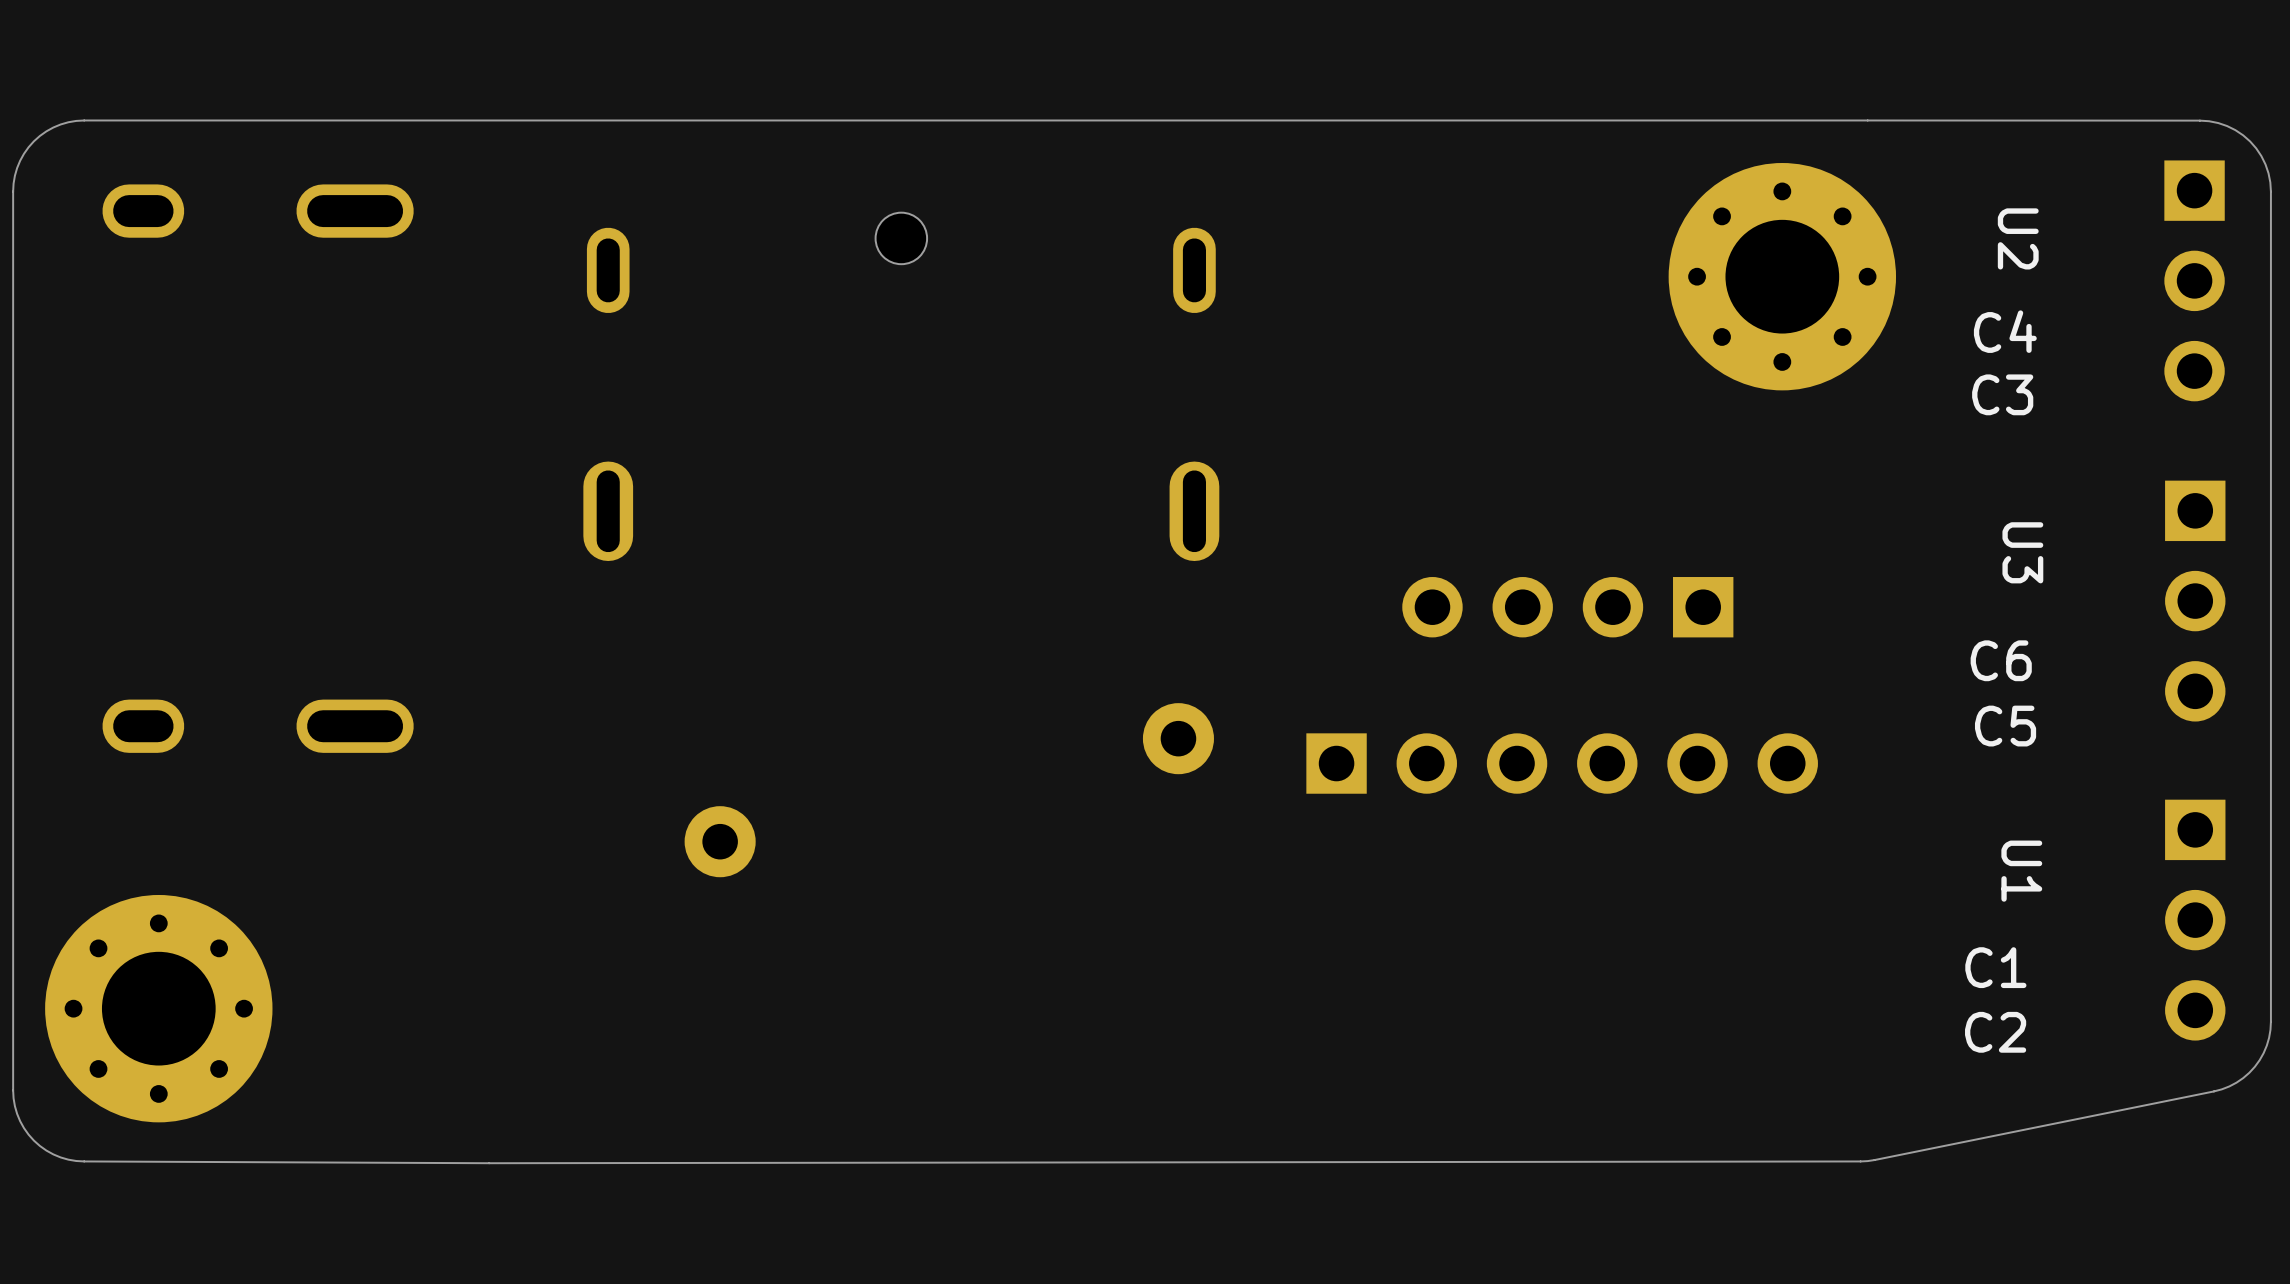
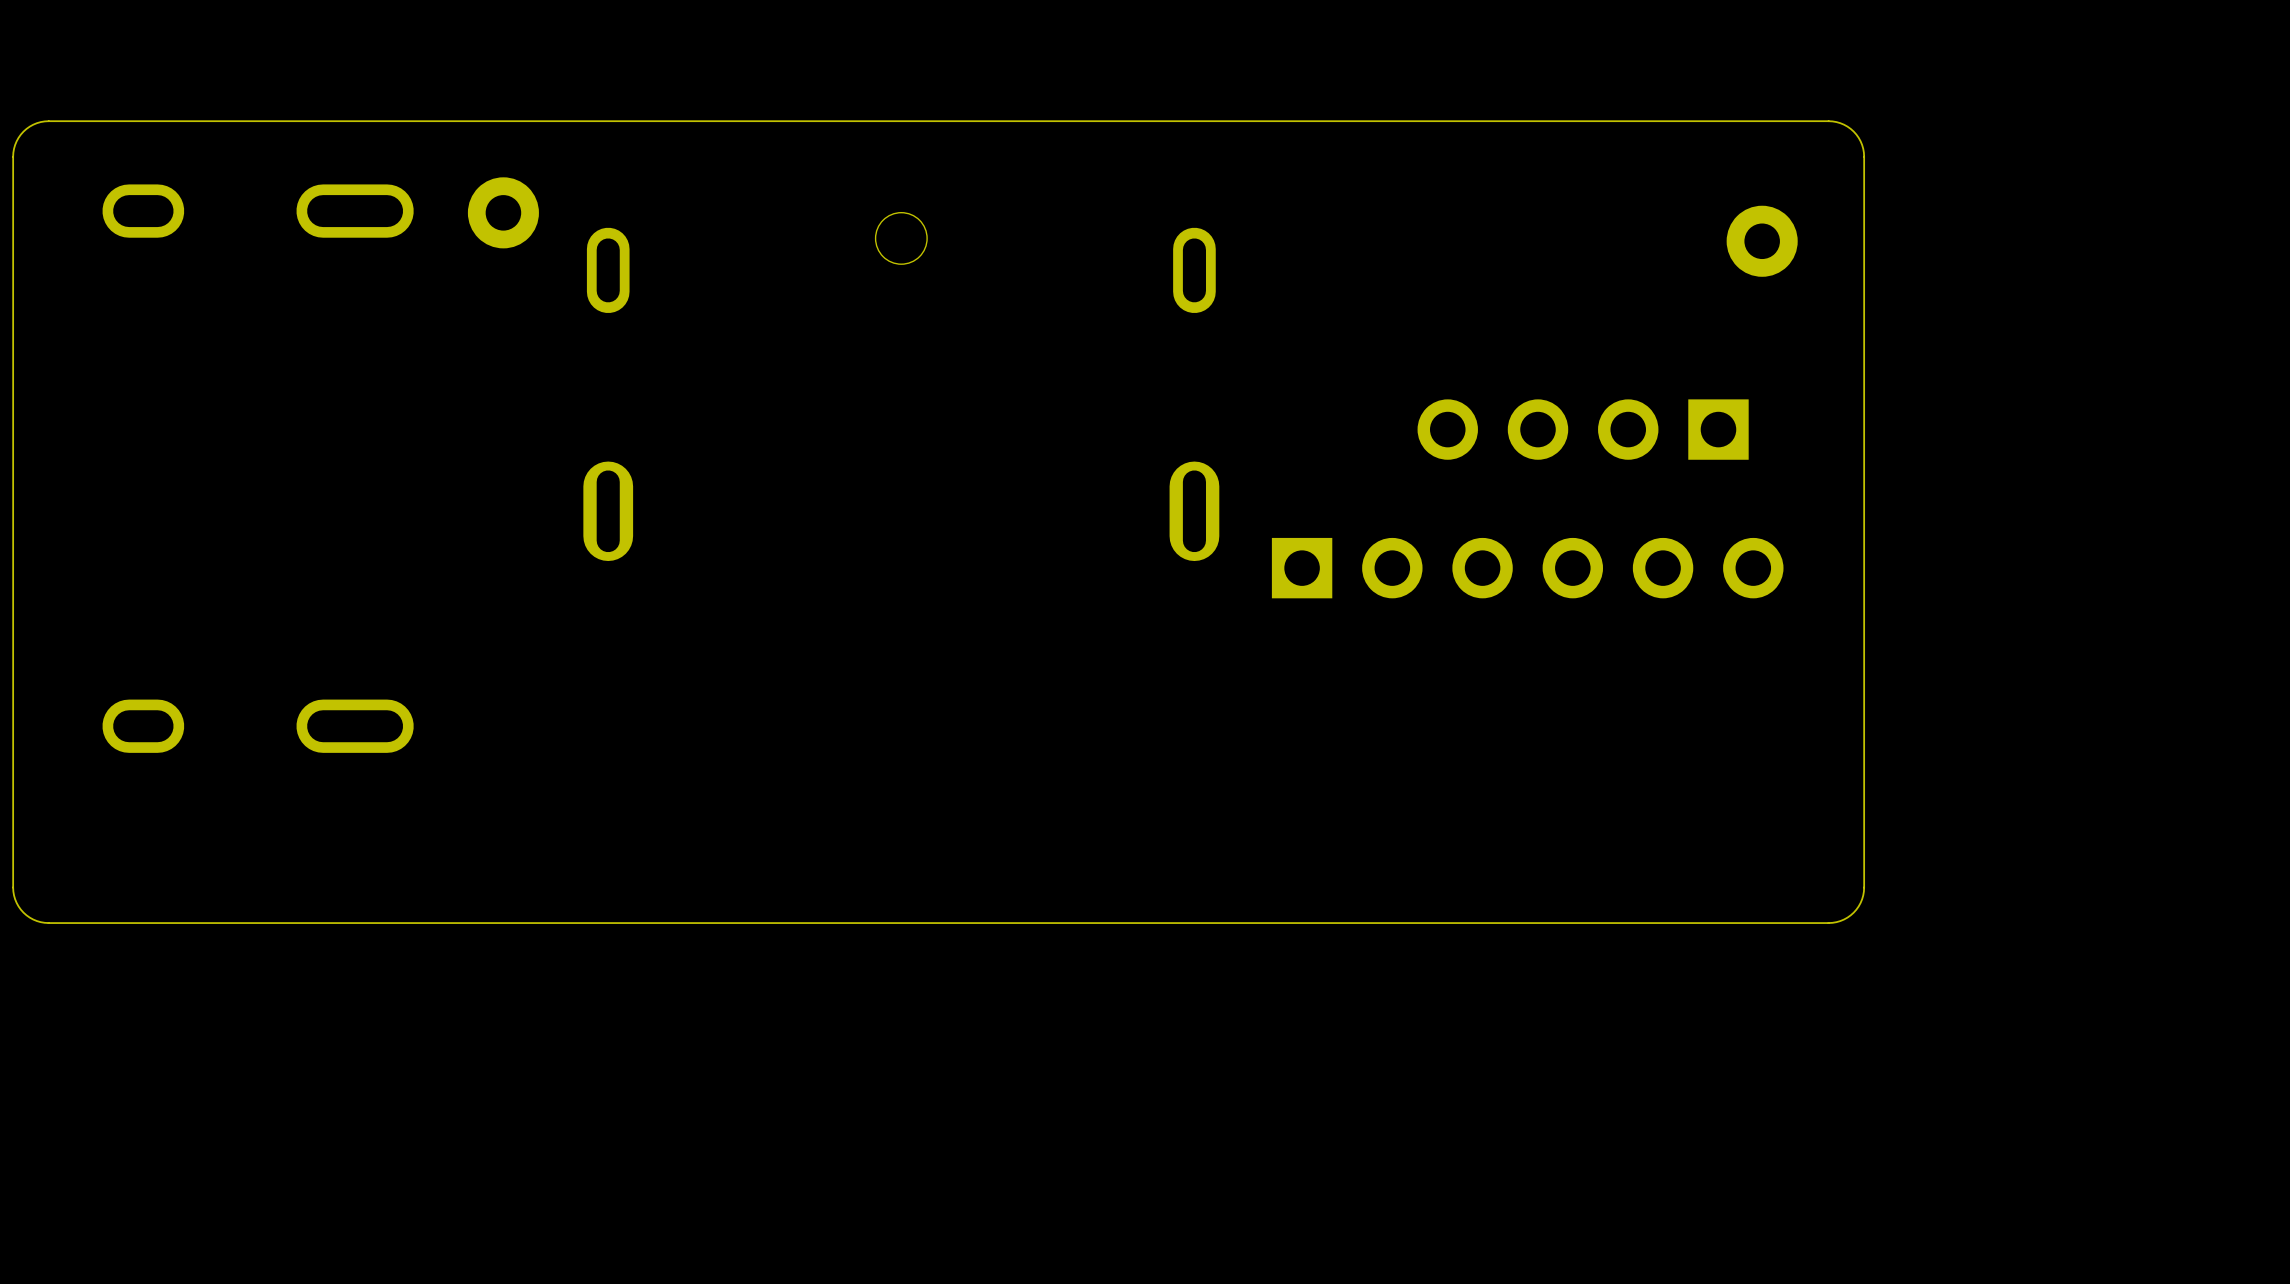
board edge: (13, 191) (17, 168) (24, 153) (33, 141) (46, 131) (60, 124) (84, 120) (2199, 120) (2227, 126) (2250, 141) (2261, 156) (2268, 173) (2270, 191) (2270, 1029) (2263, 1053) (2254, 1066) (2243, 1078) (2221, 1089) (1867, 1161) (489, 1163) (76, 1160) (53, 1154) (33, 1140) (24, 1128) (14, 1106) (13, 1090) (13, 887) -> (13, 191) (13, 152) (16, 141) (29, 126) (48, 121) (1828, 121) (1840, 123) (1853, 131) (1860, 141) (1864, 156) (1864, 887) (1858, 906) (1850, 915) (1840, 921) (1828, 923) (48, 923) (33, 919) (23, 912) (16, 902) (13, 887)
part: none -> (503, 212)
U2: (2018, 238) -> none
part: none -> (1762, 241)
part: (1782, 276) -> none
part: (2194, 280) -> none
C4: (2005, 331) -> none
C3: (2002, 394) -> none
U3: (2022, 552) -> none
part: (2195, 601) -> none
part position: (1567, 607) -> (1583, 429)
C6: (2001, 660) -> none
C5: (2005, 726) -> none
part: (1178, 738) -> none
part position: (1562, 763) -> (1527, 568)
part: (720, 841) -> none
U1: (2021, 871) -> none
part: (2195, 920) -> none
C1: (1995, 967) -> none
part: (158, 1008) -> none
C2: (1995, 1032) -> none

